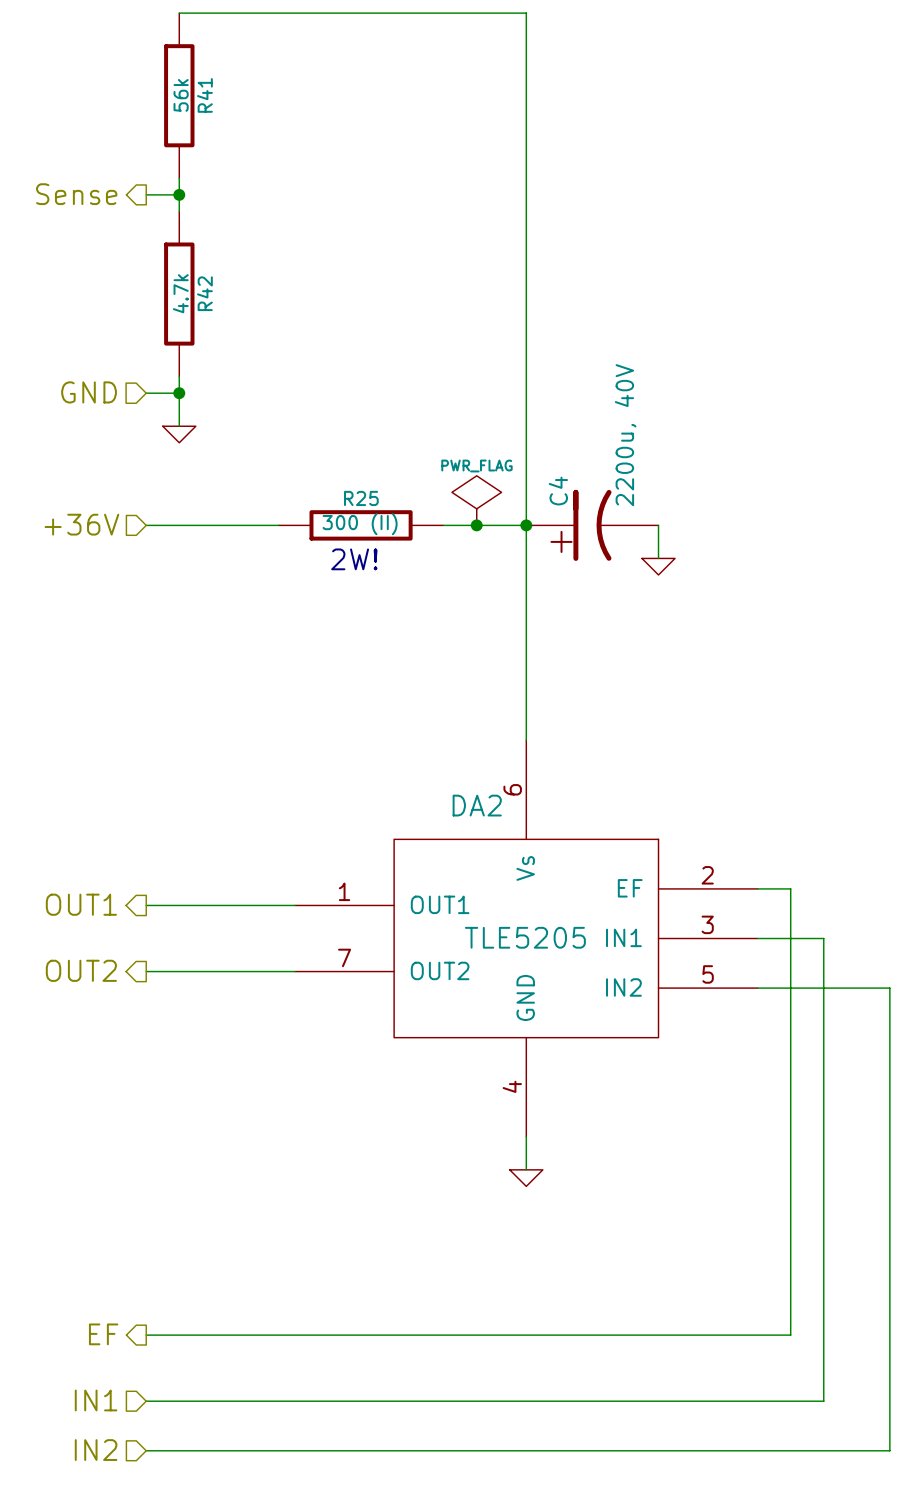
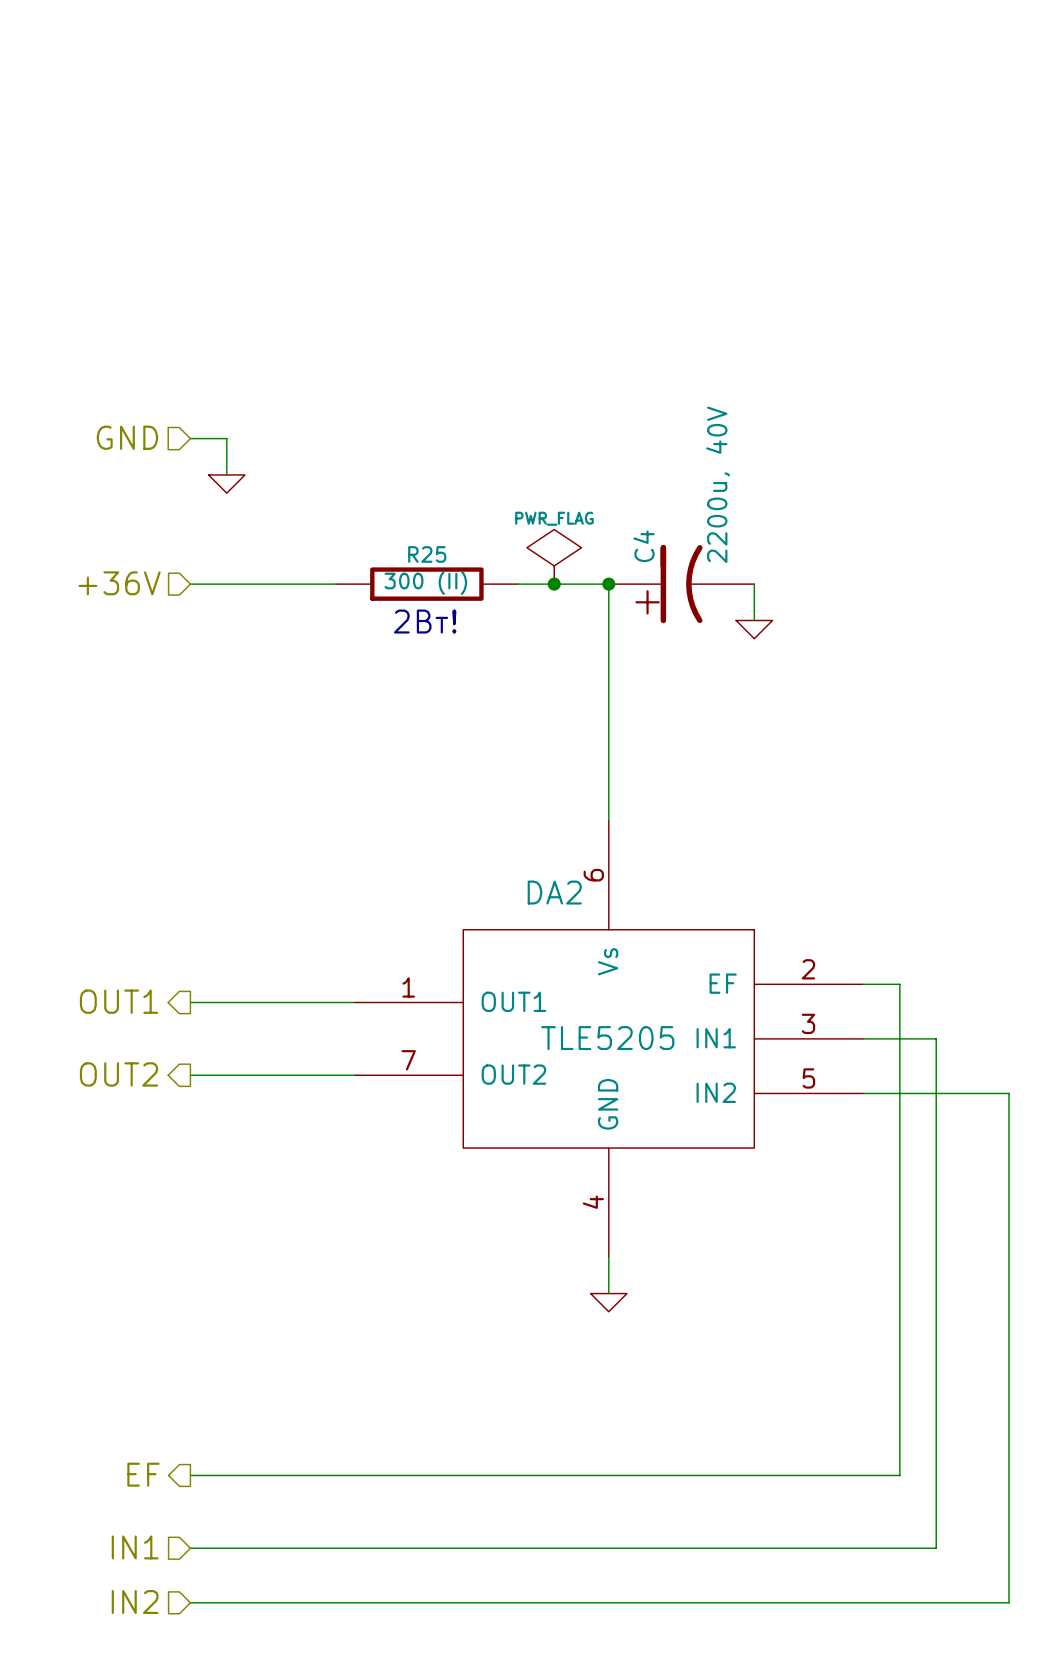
wire: (179, 13) (526, 13) (526, 525) -> none
R41: 56k (179, 95) -> none
wire: (179, 178) (179, 211) -> none
hierarchical label: Sense (76, 194) -> none
wire: (146, 194) (179, 194) -> none
junction: (179, 194) -> none
R42: 4.7k (179, 294) -> none
wire: (179, 376) (179, 393) -> none
junction: (179, 393) -> none
text: 2W! (354, 559) -> 2Вт! (425, 621)

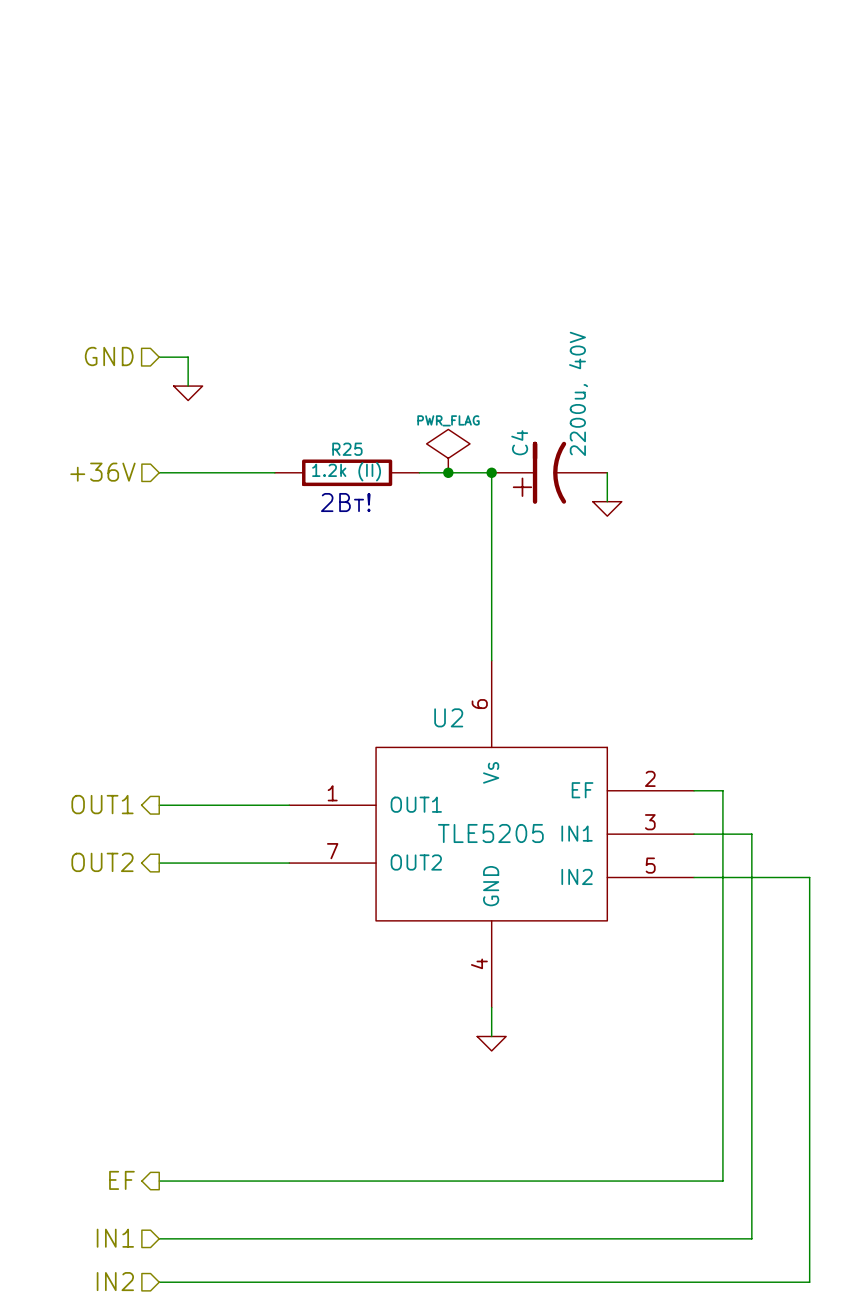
R25 value: 300 (II) (425, 582) -> 1.2k (II) (346, 471)
DA2 name: DA2 (554, 892) -> U2 (448, 717)

